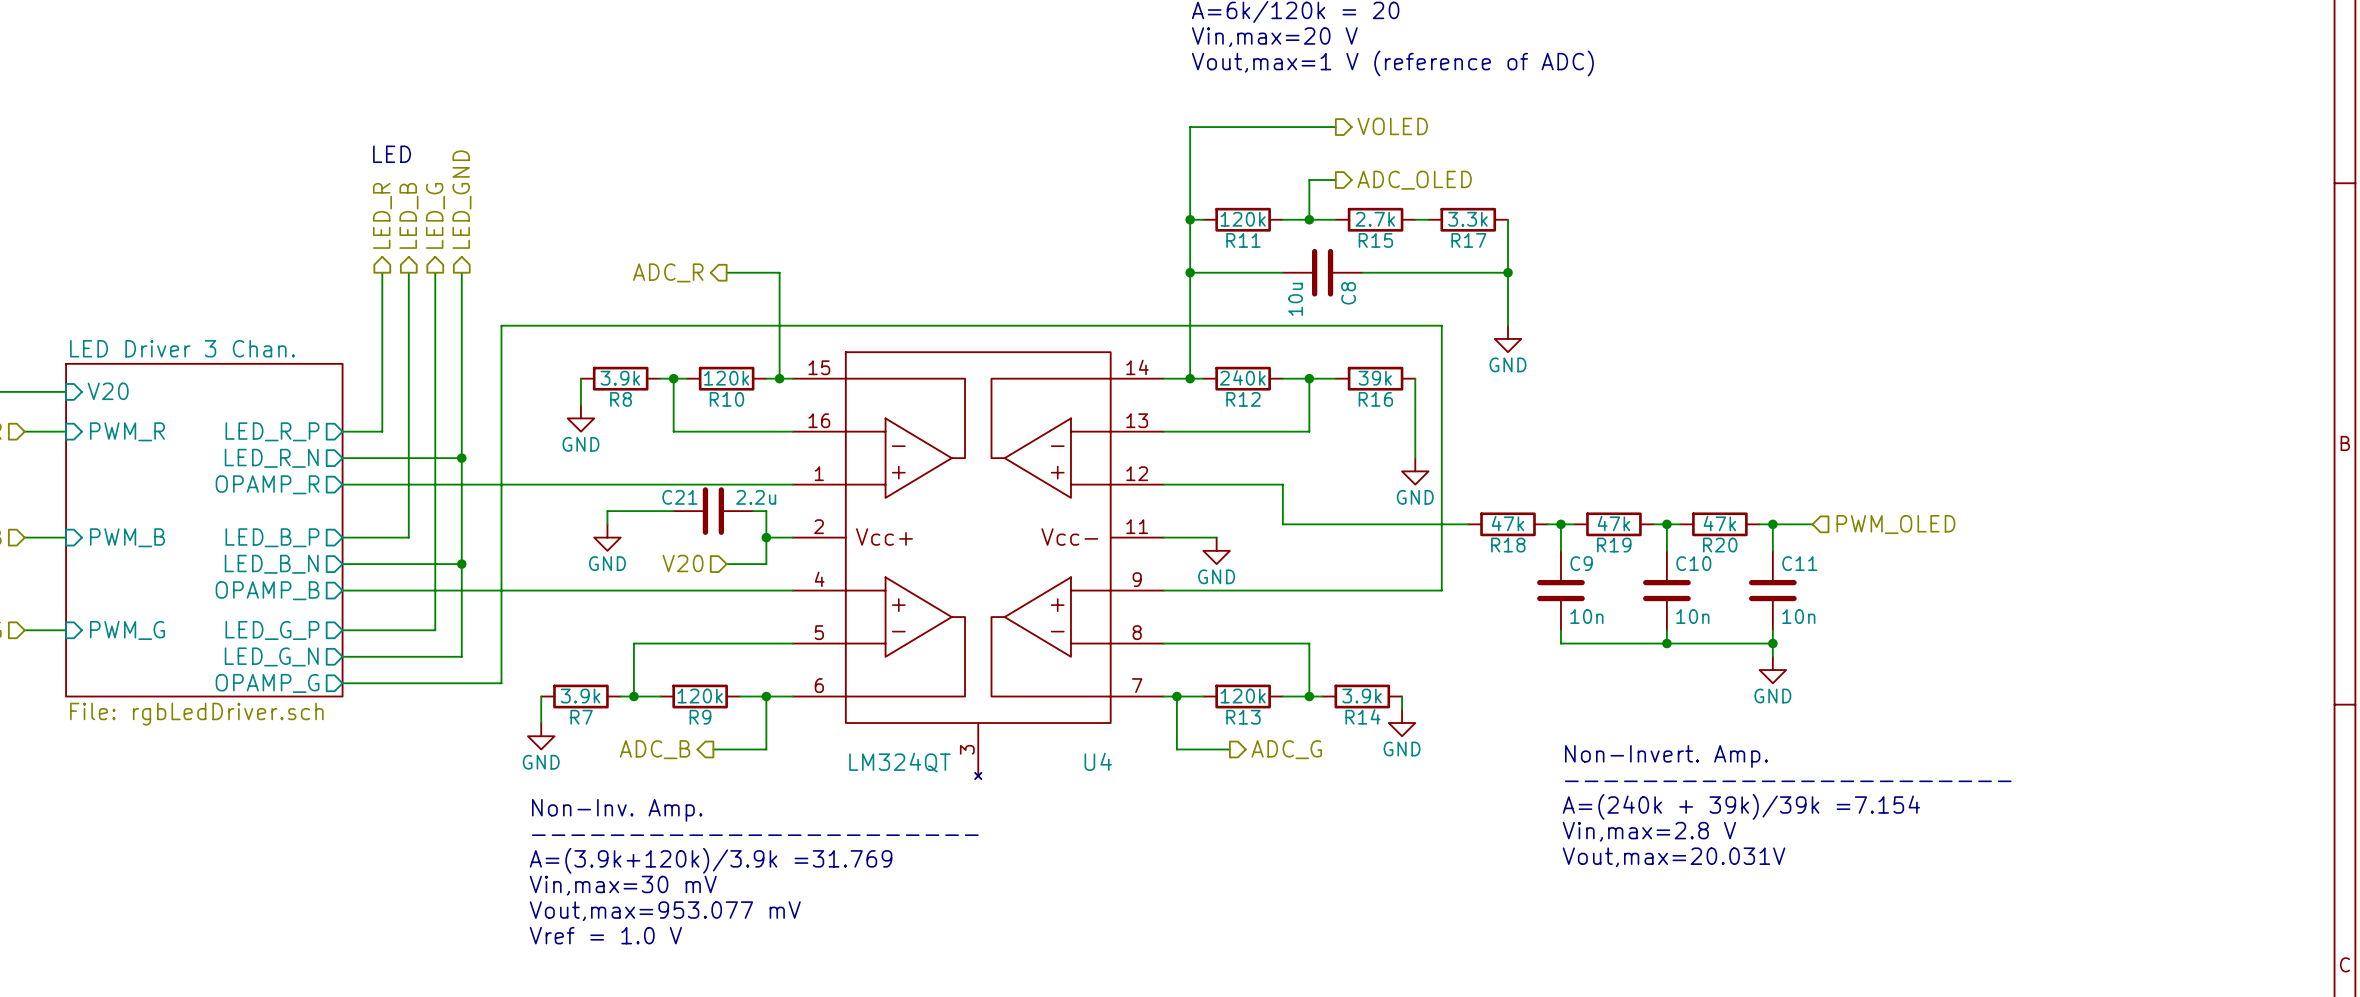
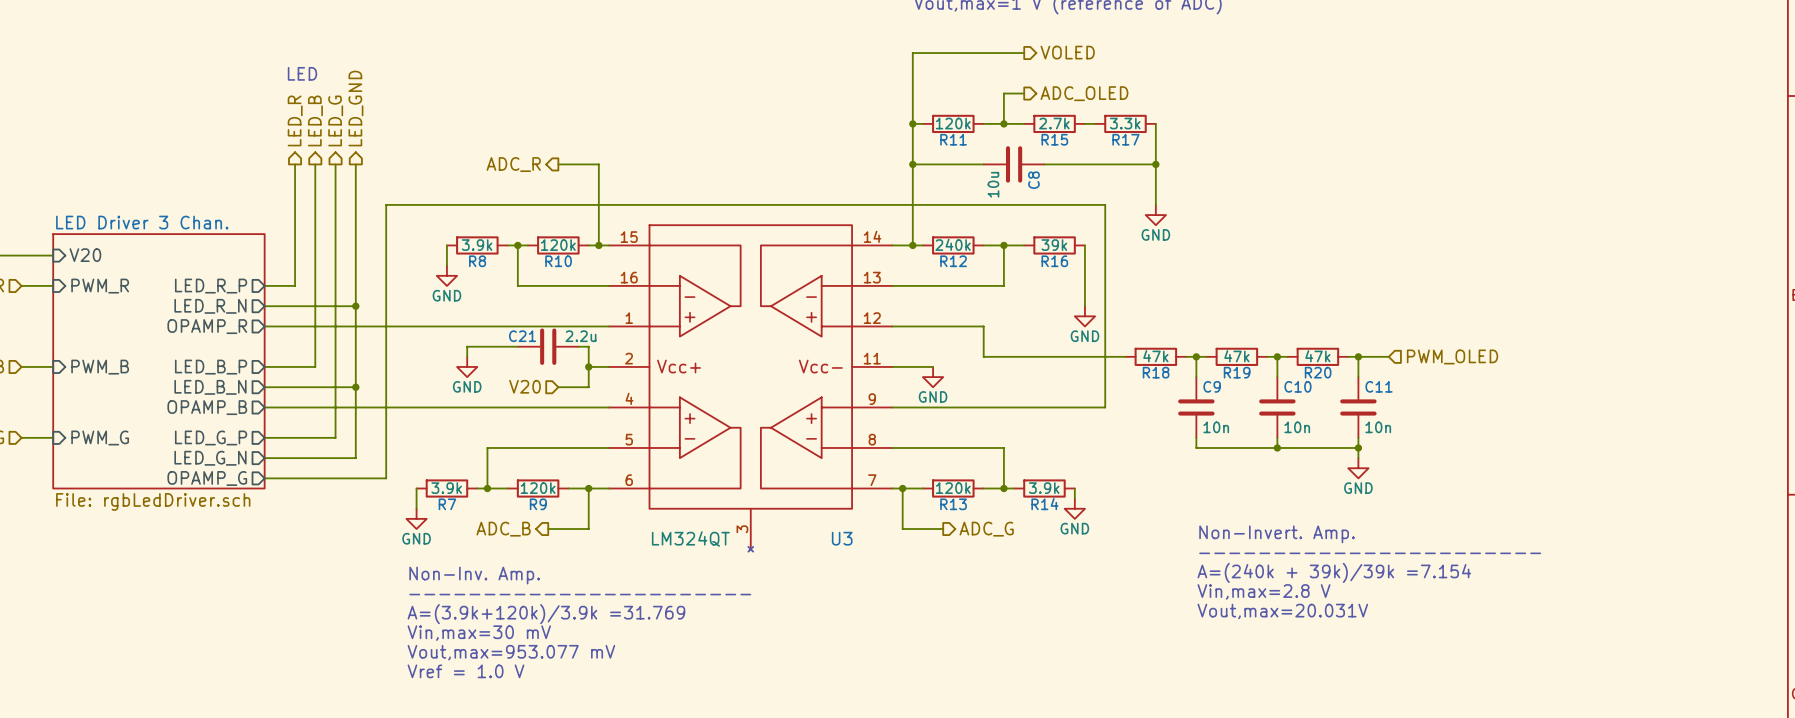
U4 name: U4 (1098, 761) -> U3 (842, 538)

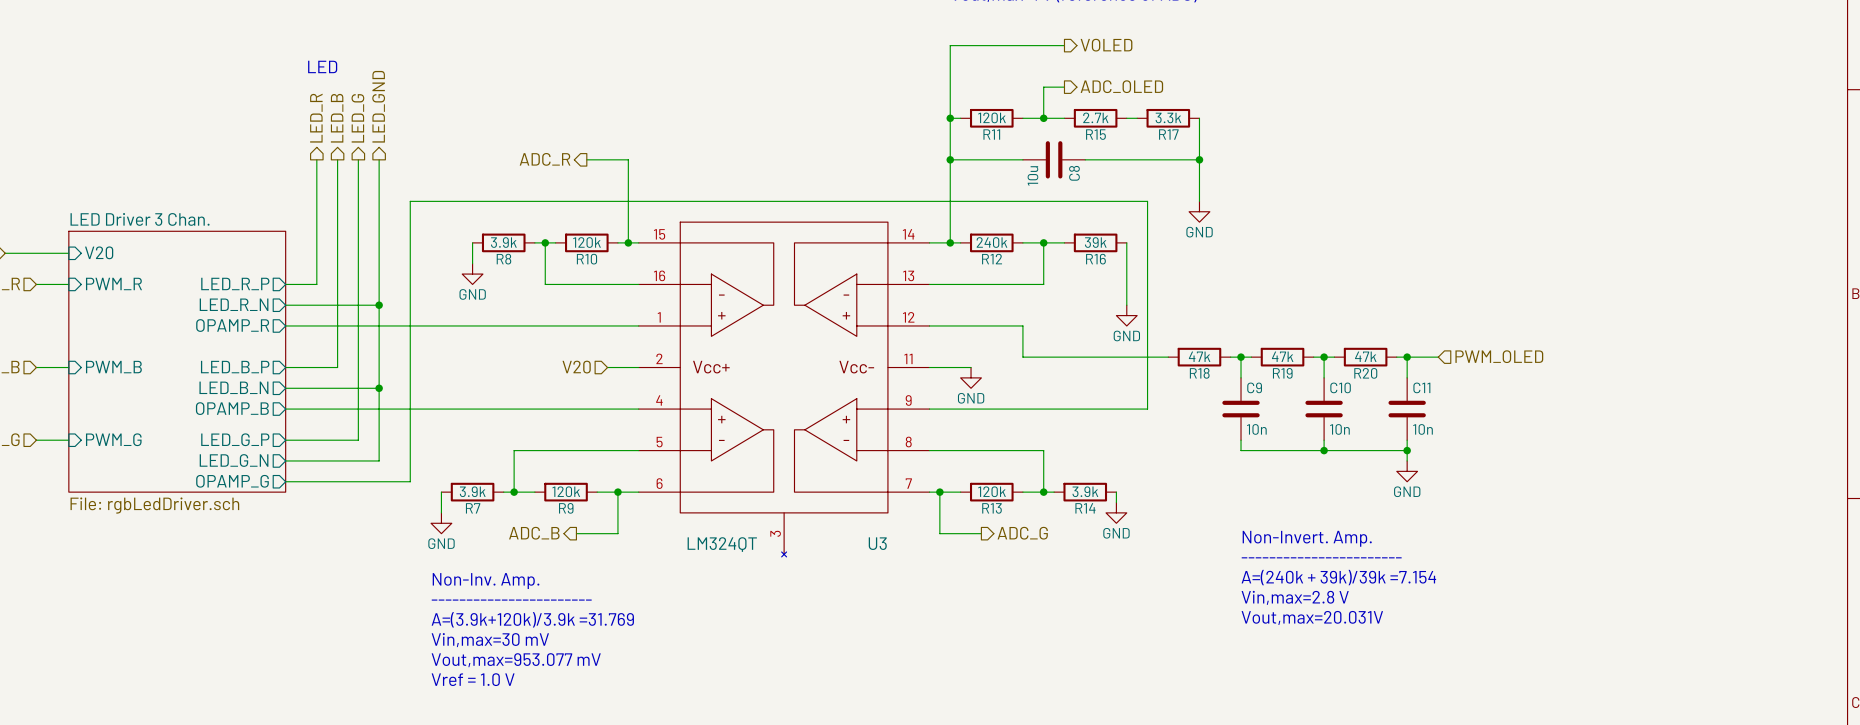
wire: (517, 346) (467, 346) (467, 356) -> none
C21: 2.2u (548, 346) -> none
wire: (578, 346) (588, 346) (588, 387) (558, 387) -> none
power symbol: GND (467, 366) -> none
wire: none -> (607, 367) (617, 367)
junction: (588, 366) -> none
hierarchical label position: V20 (525, 386) -> V20 (576, 367)

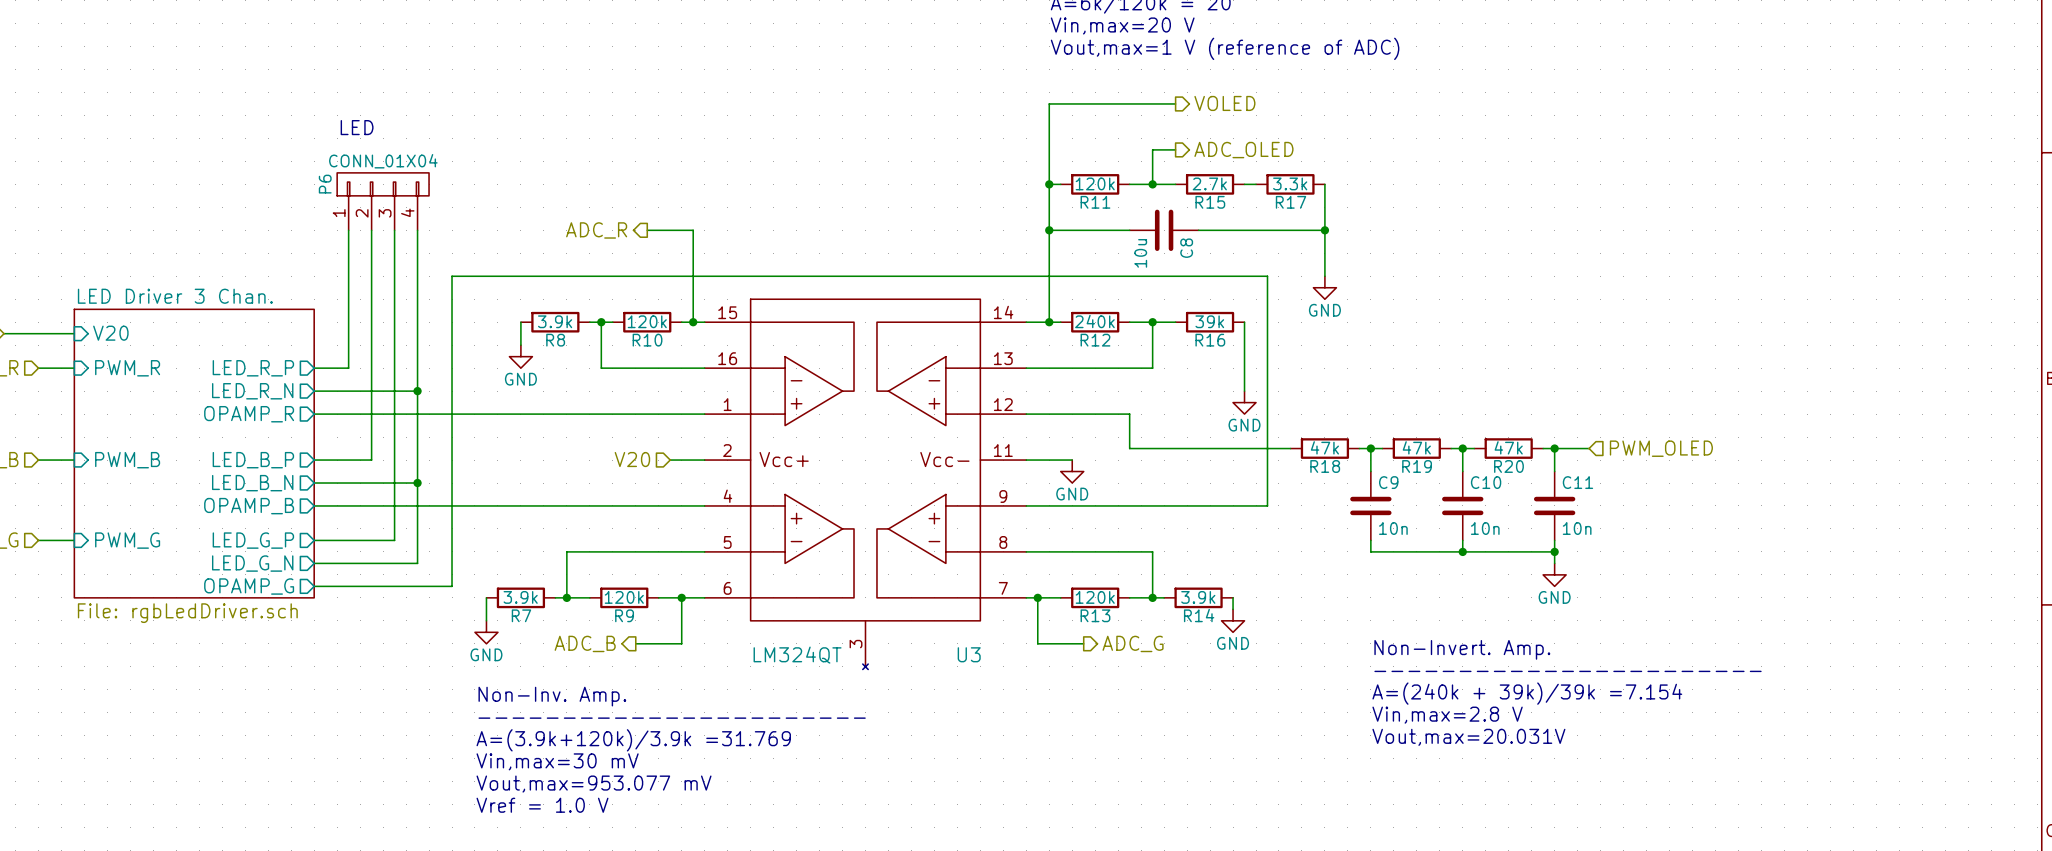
hierarchical label: LED_GND (378, 106) -> none
hierarchical label: LED_R (316, 118) -> none
hierarchical label: LED_B (337, 118) -> none
hierarchical label: LED_G (357, 118) -> none
P6: none -> CONN_01X04 (383, 201)

